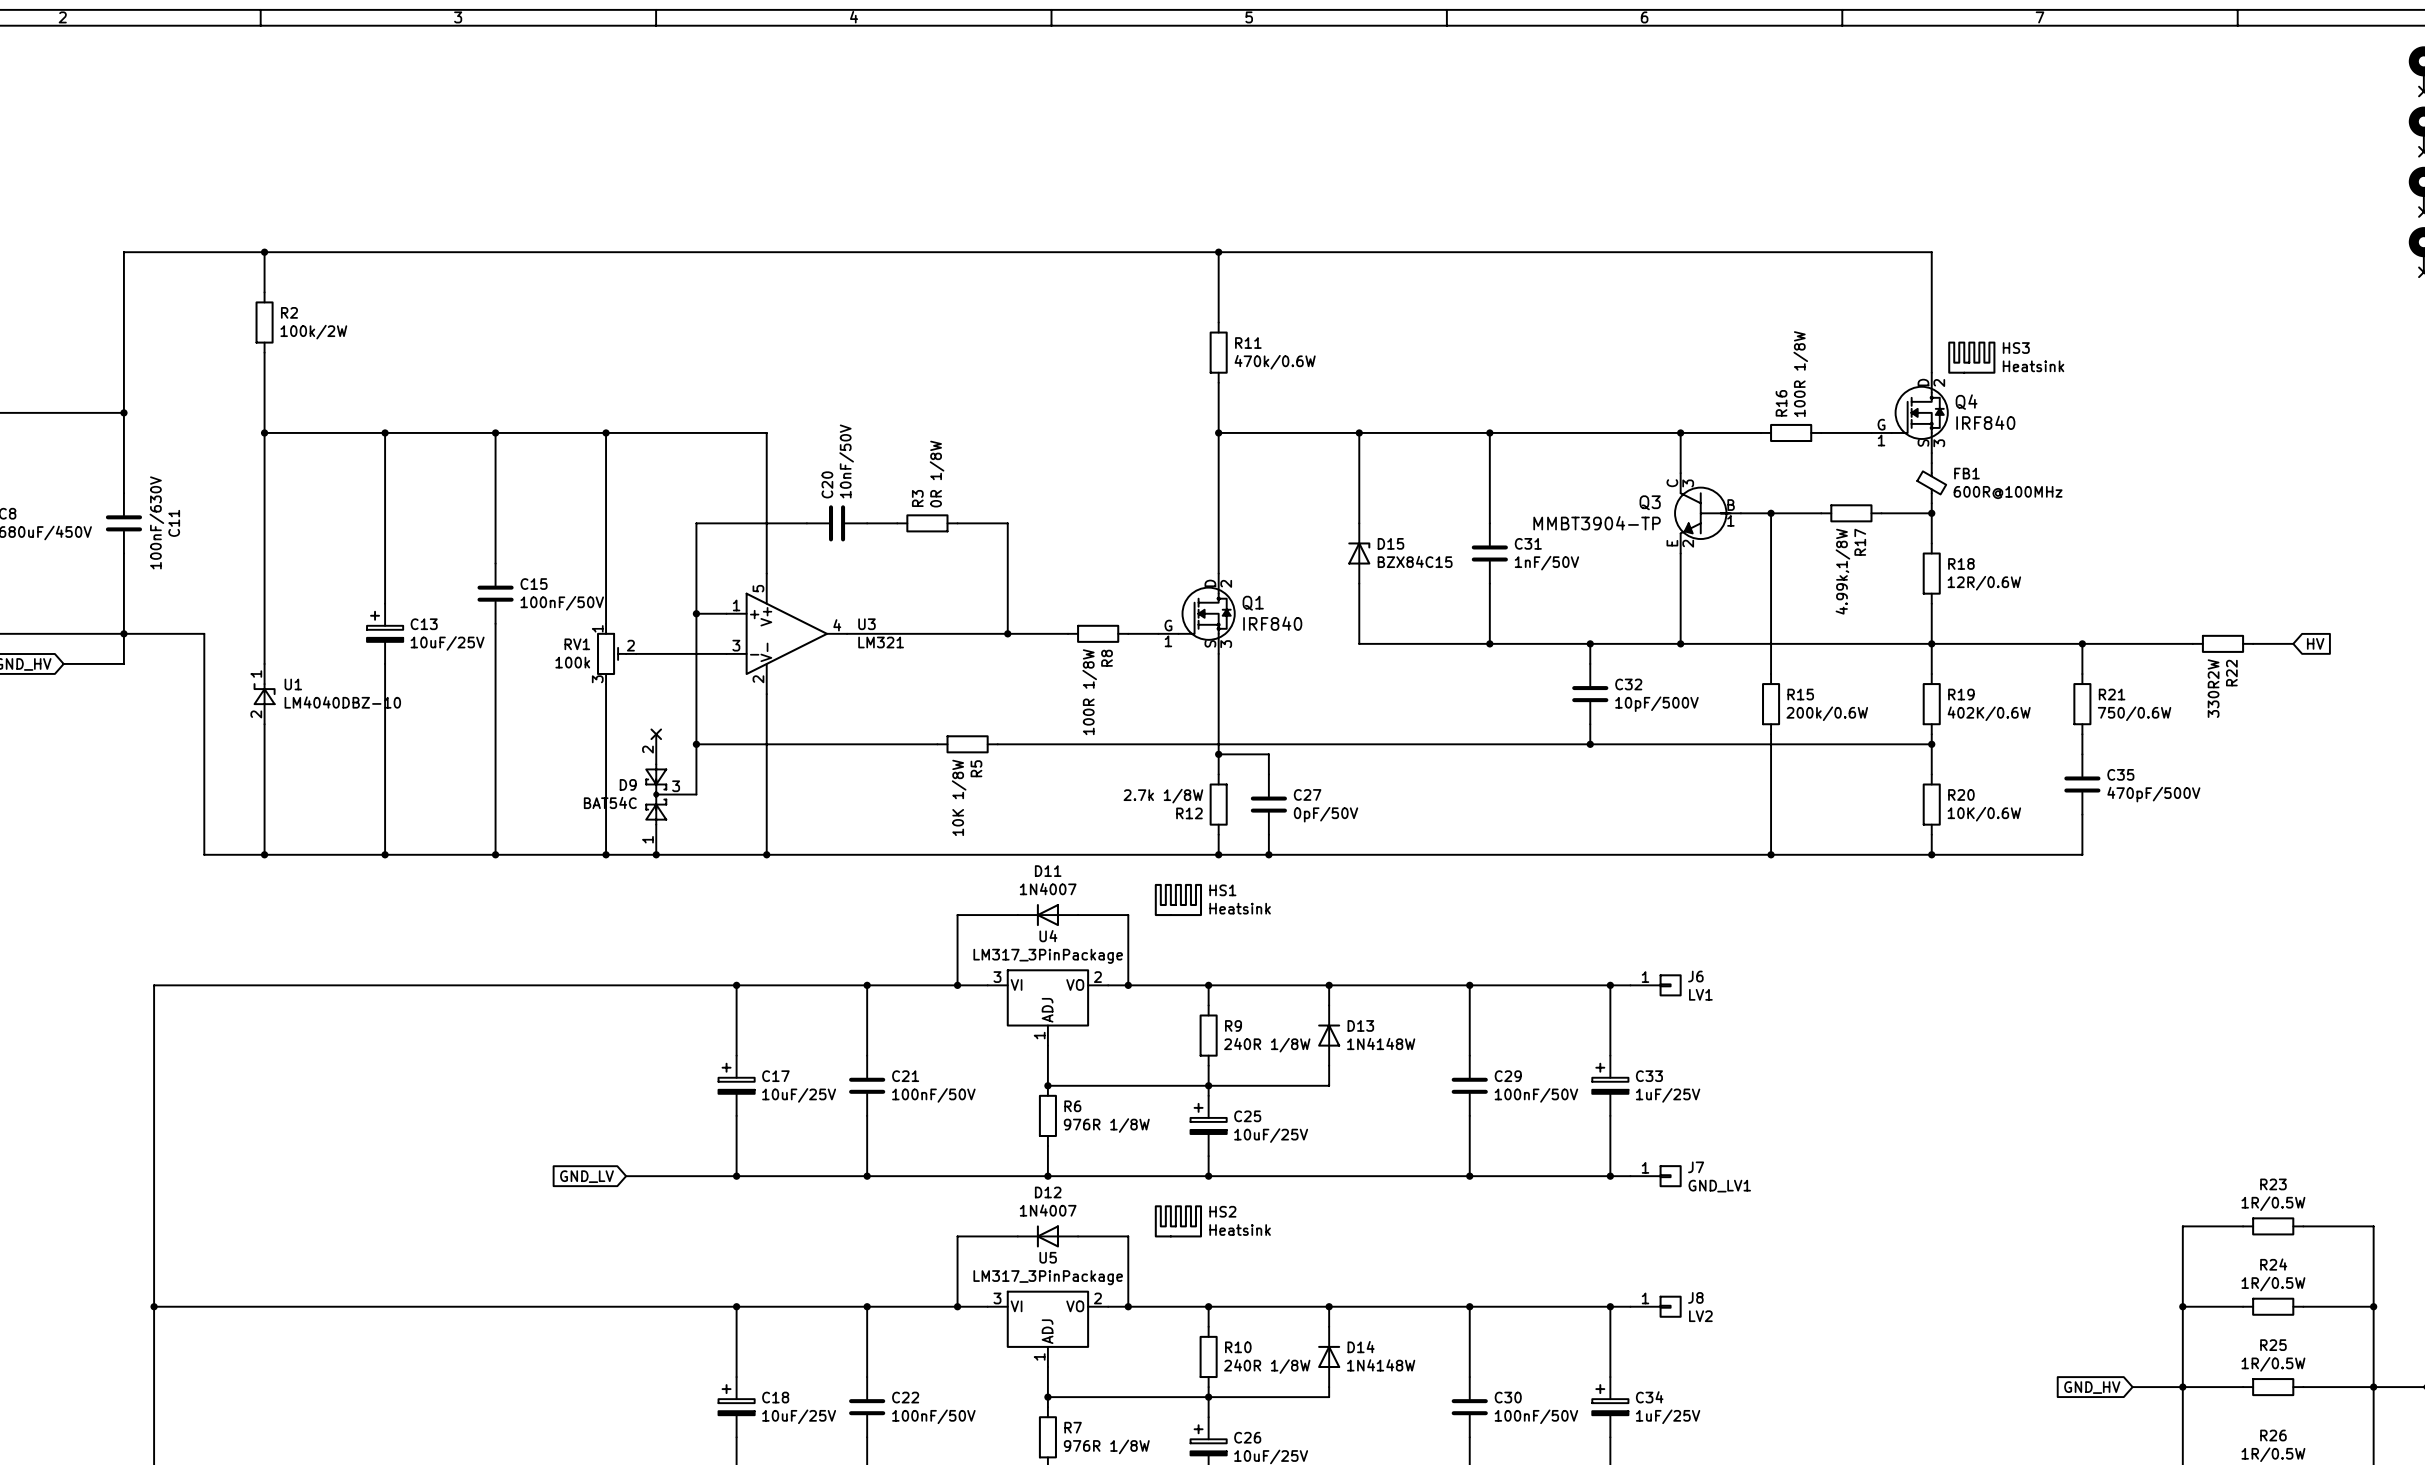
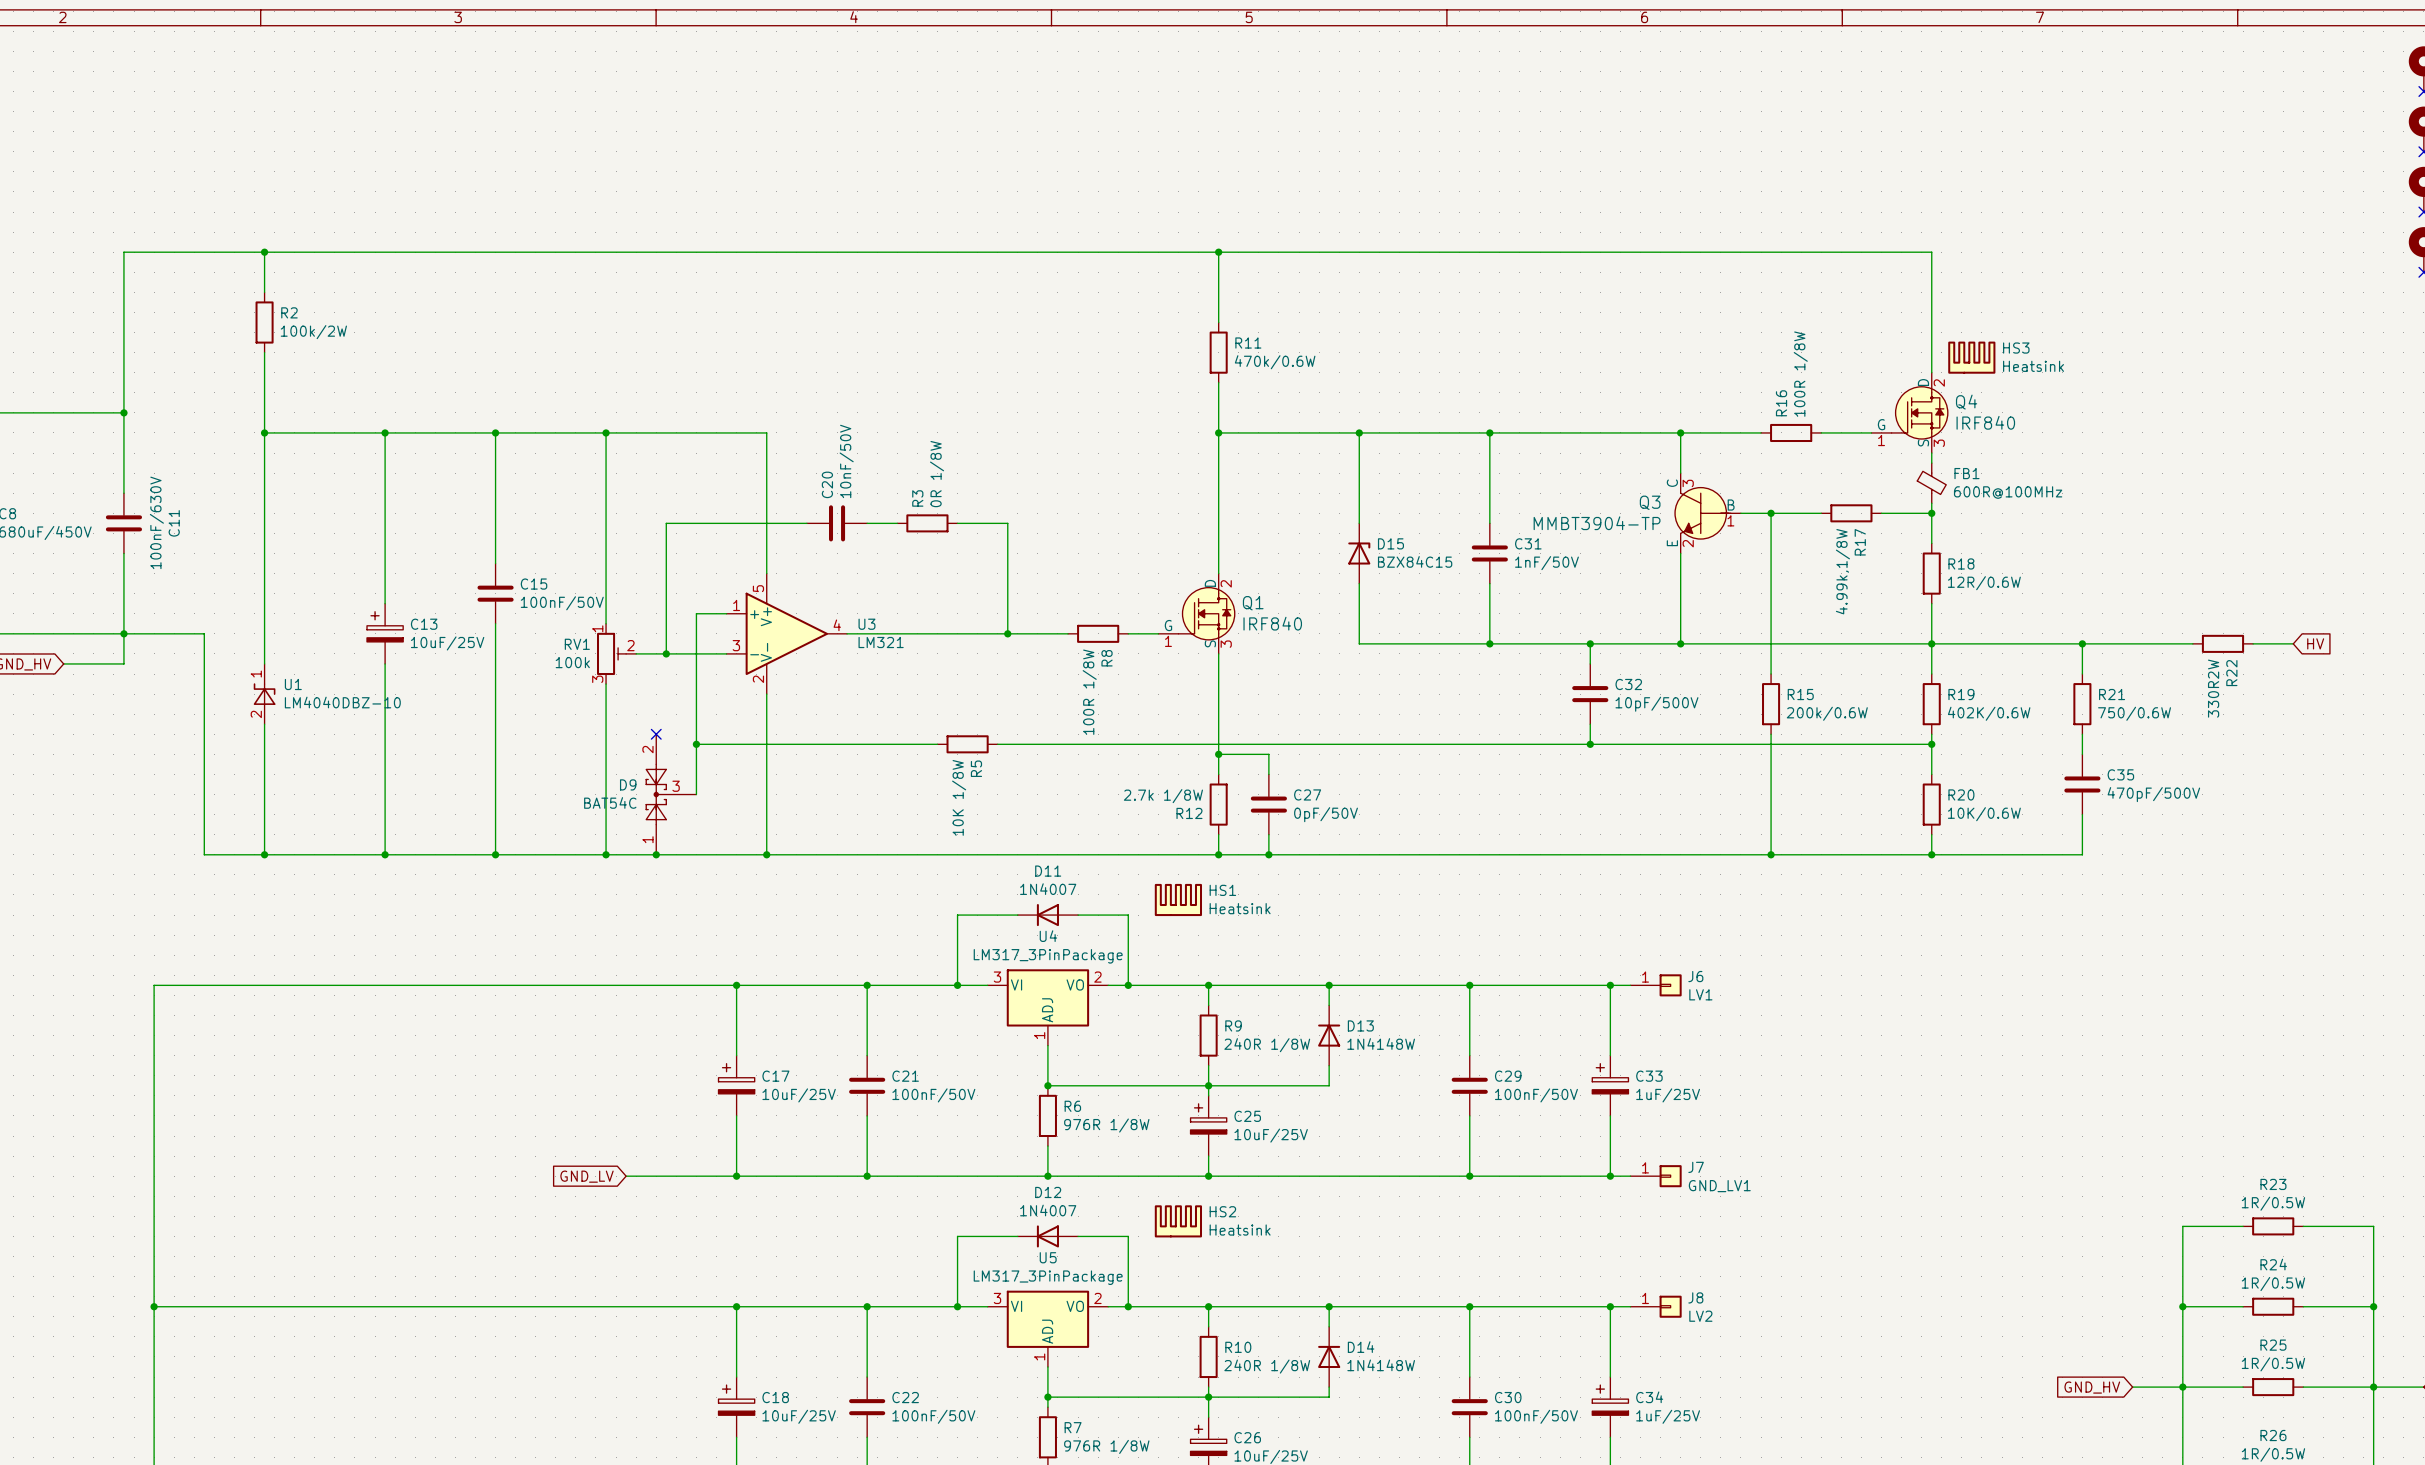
wire: (696, 523) (696, 613) -> (696, 523) (666, 523) (666, 653)
junction: (696, 613) -> none
junction: none -> (666, 653)

